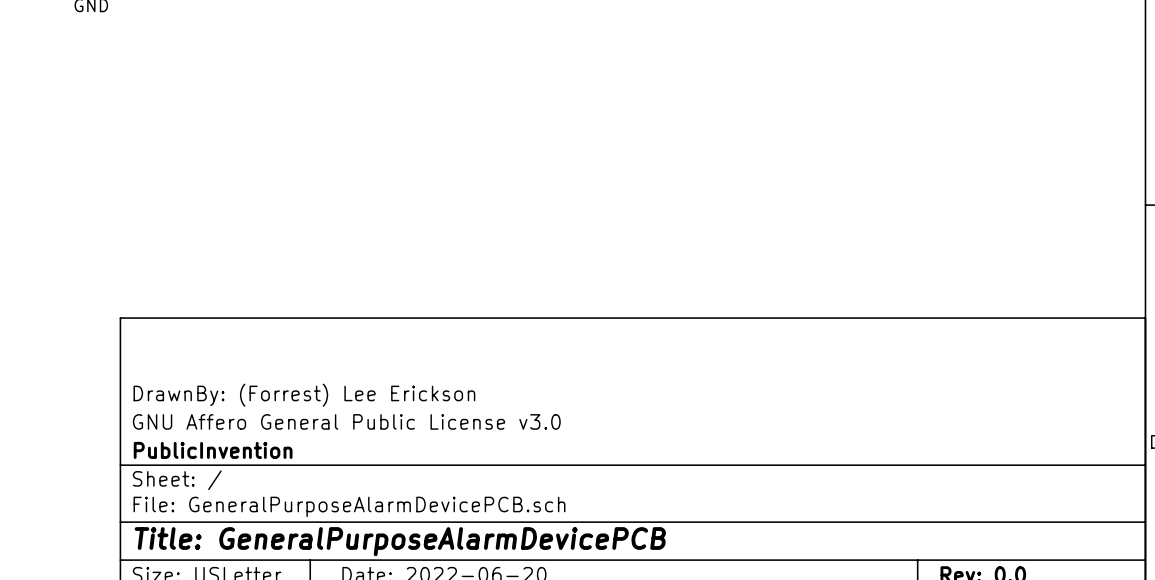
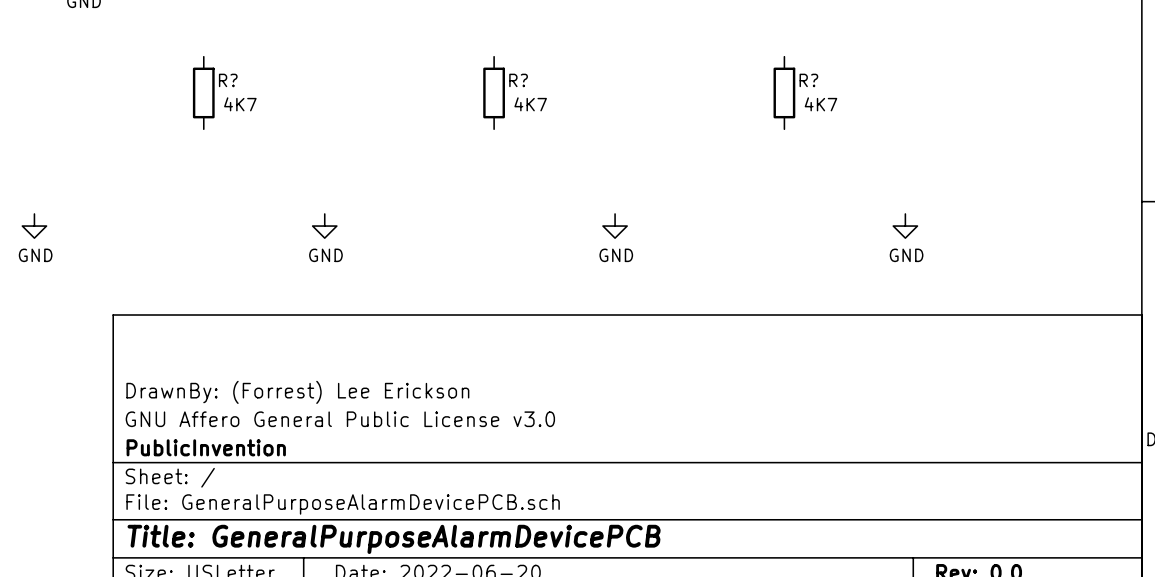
R?: none -> 4K7 (203, 92)
R?: none -> 4K7 (494, 92)
R?: none -> 4K7 (784, 92)
power symbol: none -> GND (34, 226)
power symbol: none -> GND (324, 226)
power symbol: none -> GND (615, 226)
power symbol: none -> GND (905, 226)

